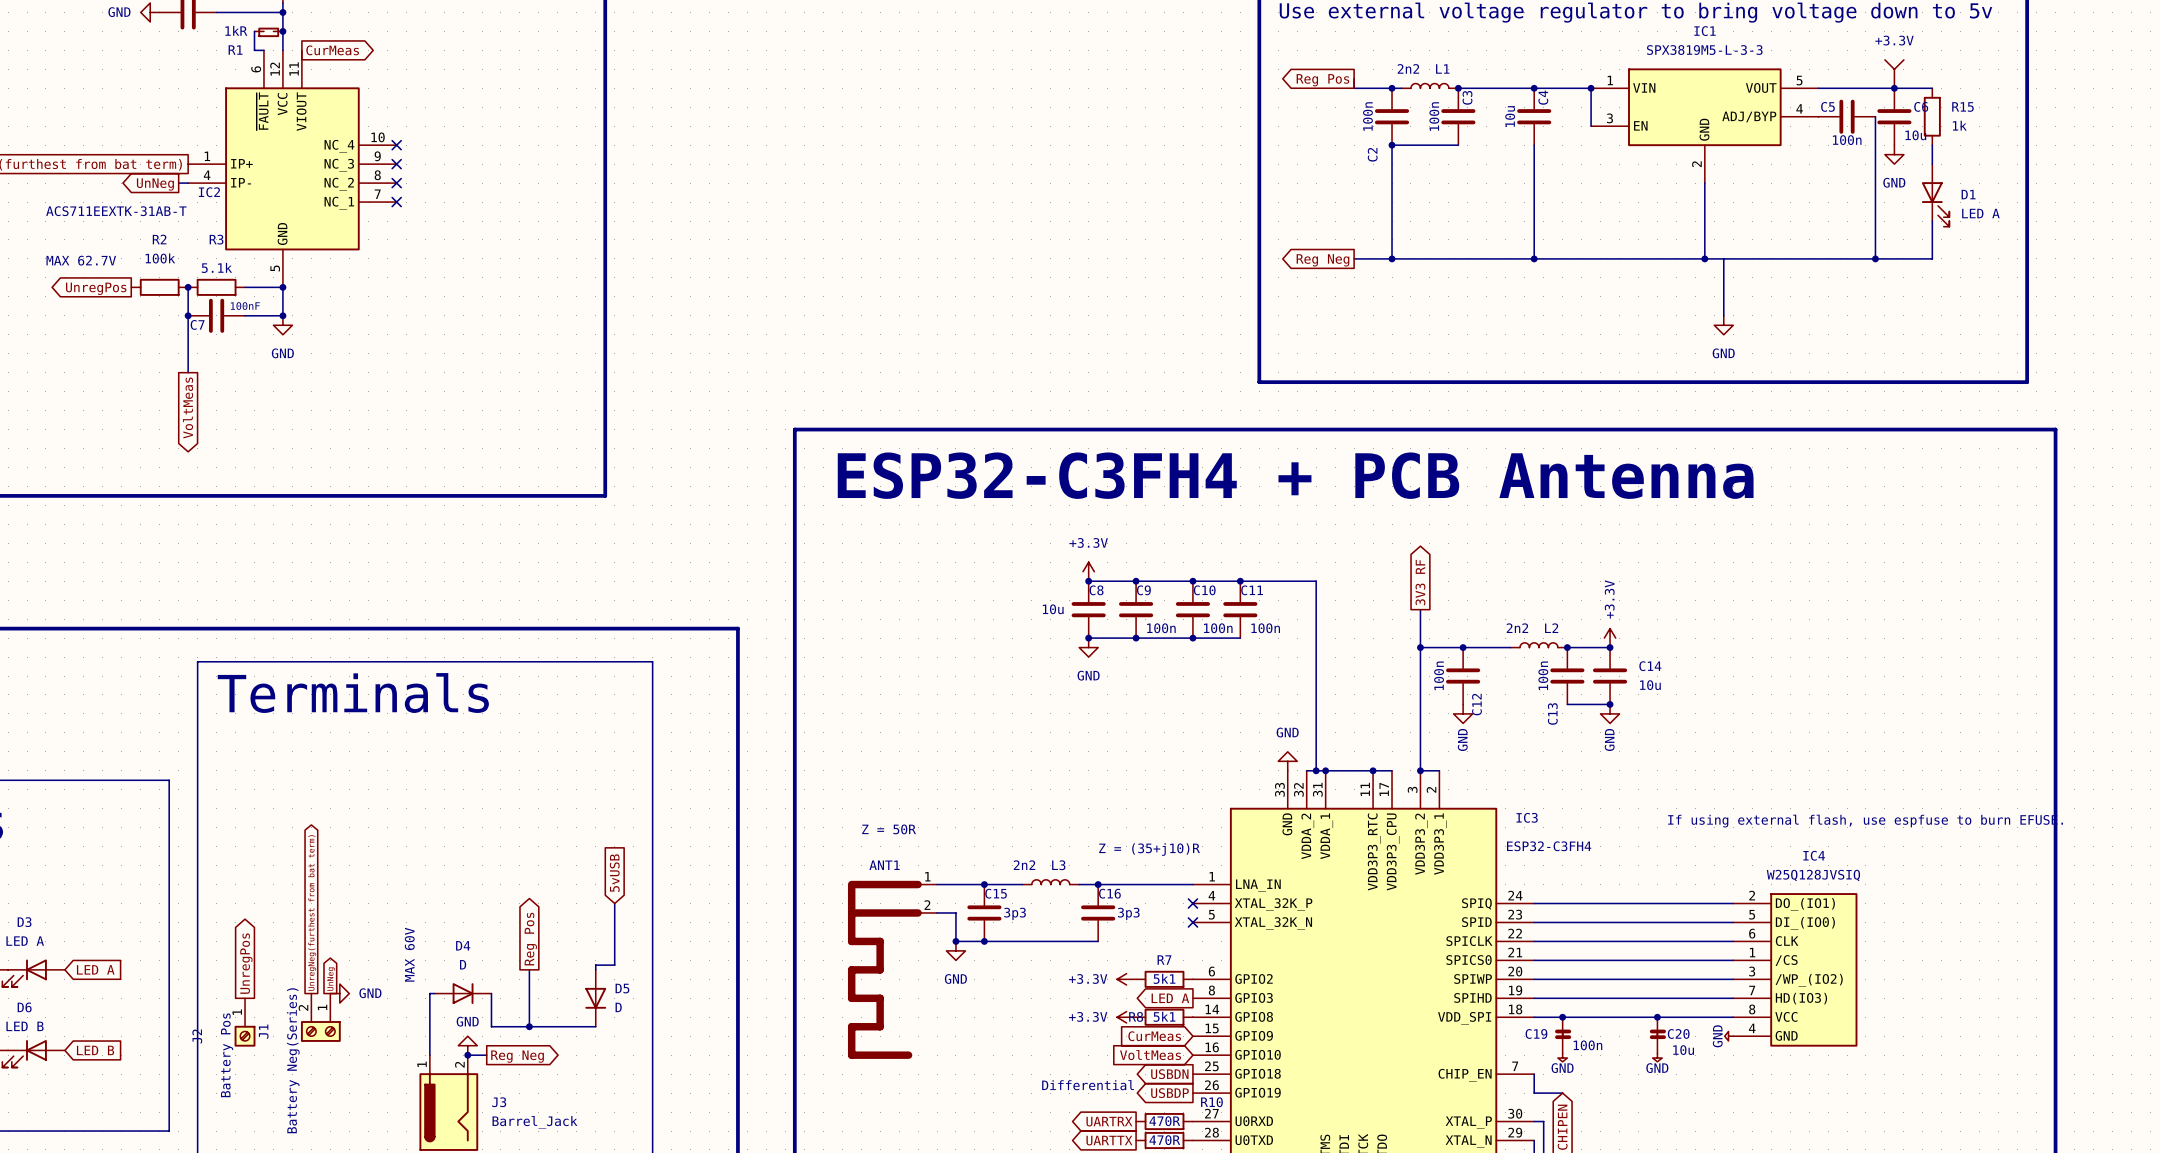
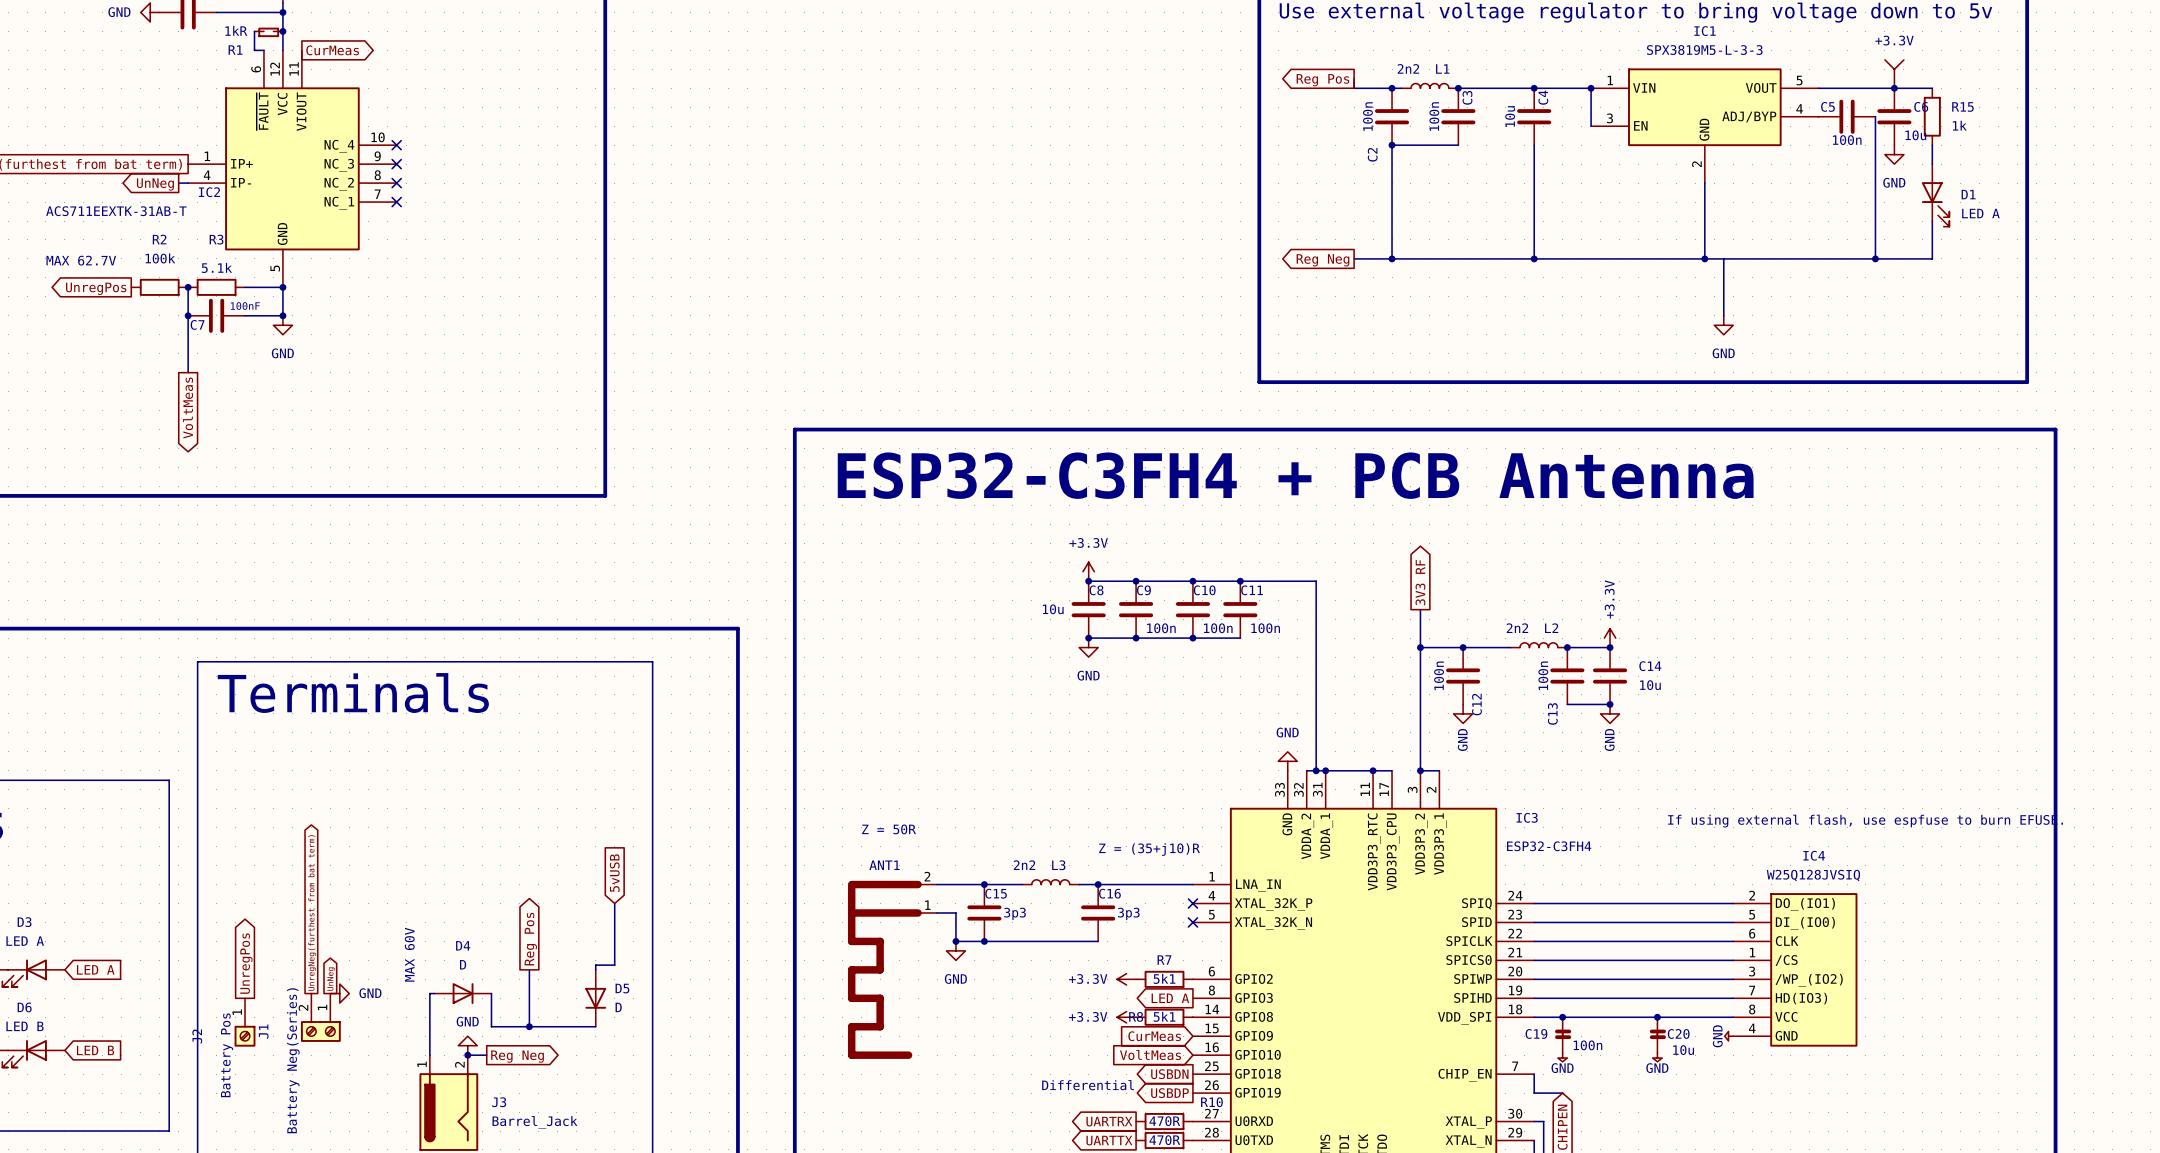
ANT1 pin number: 1 (927, 876) -> 2 (927, 876)
ANT1 pin number: 2 (927, 905) -> 1 (927, 905)

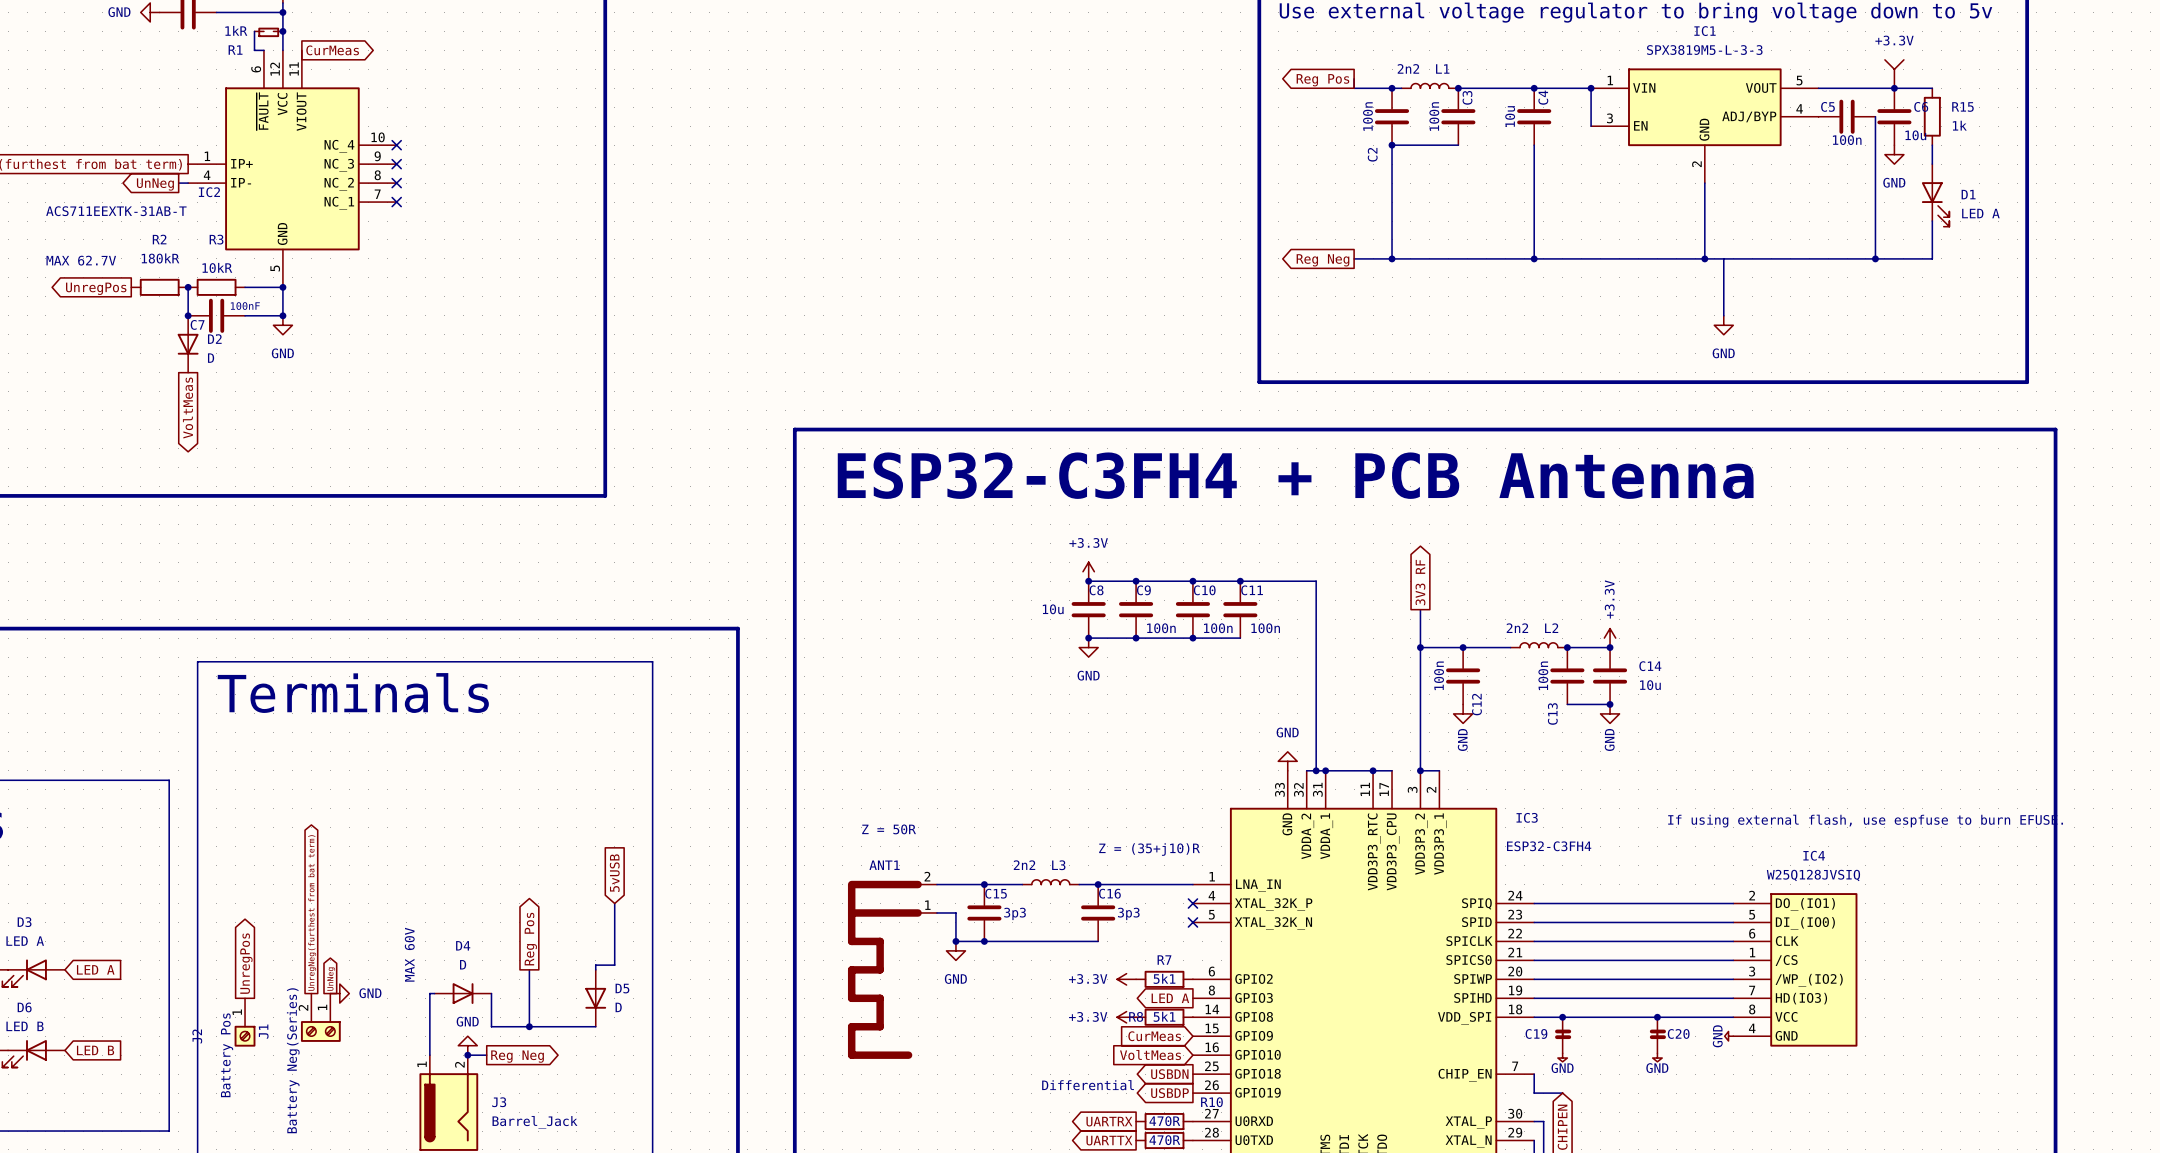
R2 value: 100k (160, 258) -> 180kR (160, 258)
R3 value: 5.1k (216, 267) -> 10kR (217, 267)
D2: none -> D (188, 344)
C19 value: 100n (1587, 1045) -> none
C20 value: 10u (1683, 1050) -> none

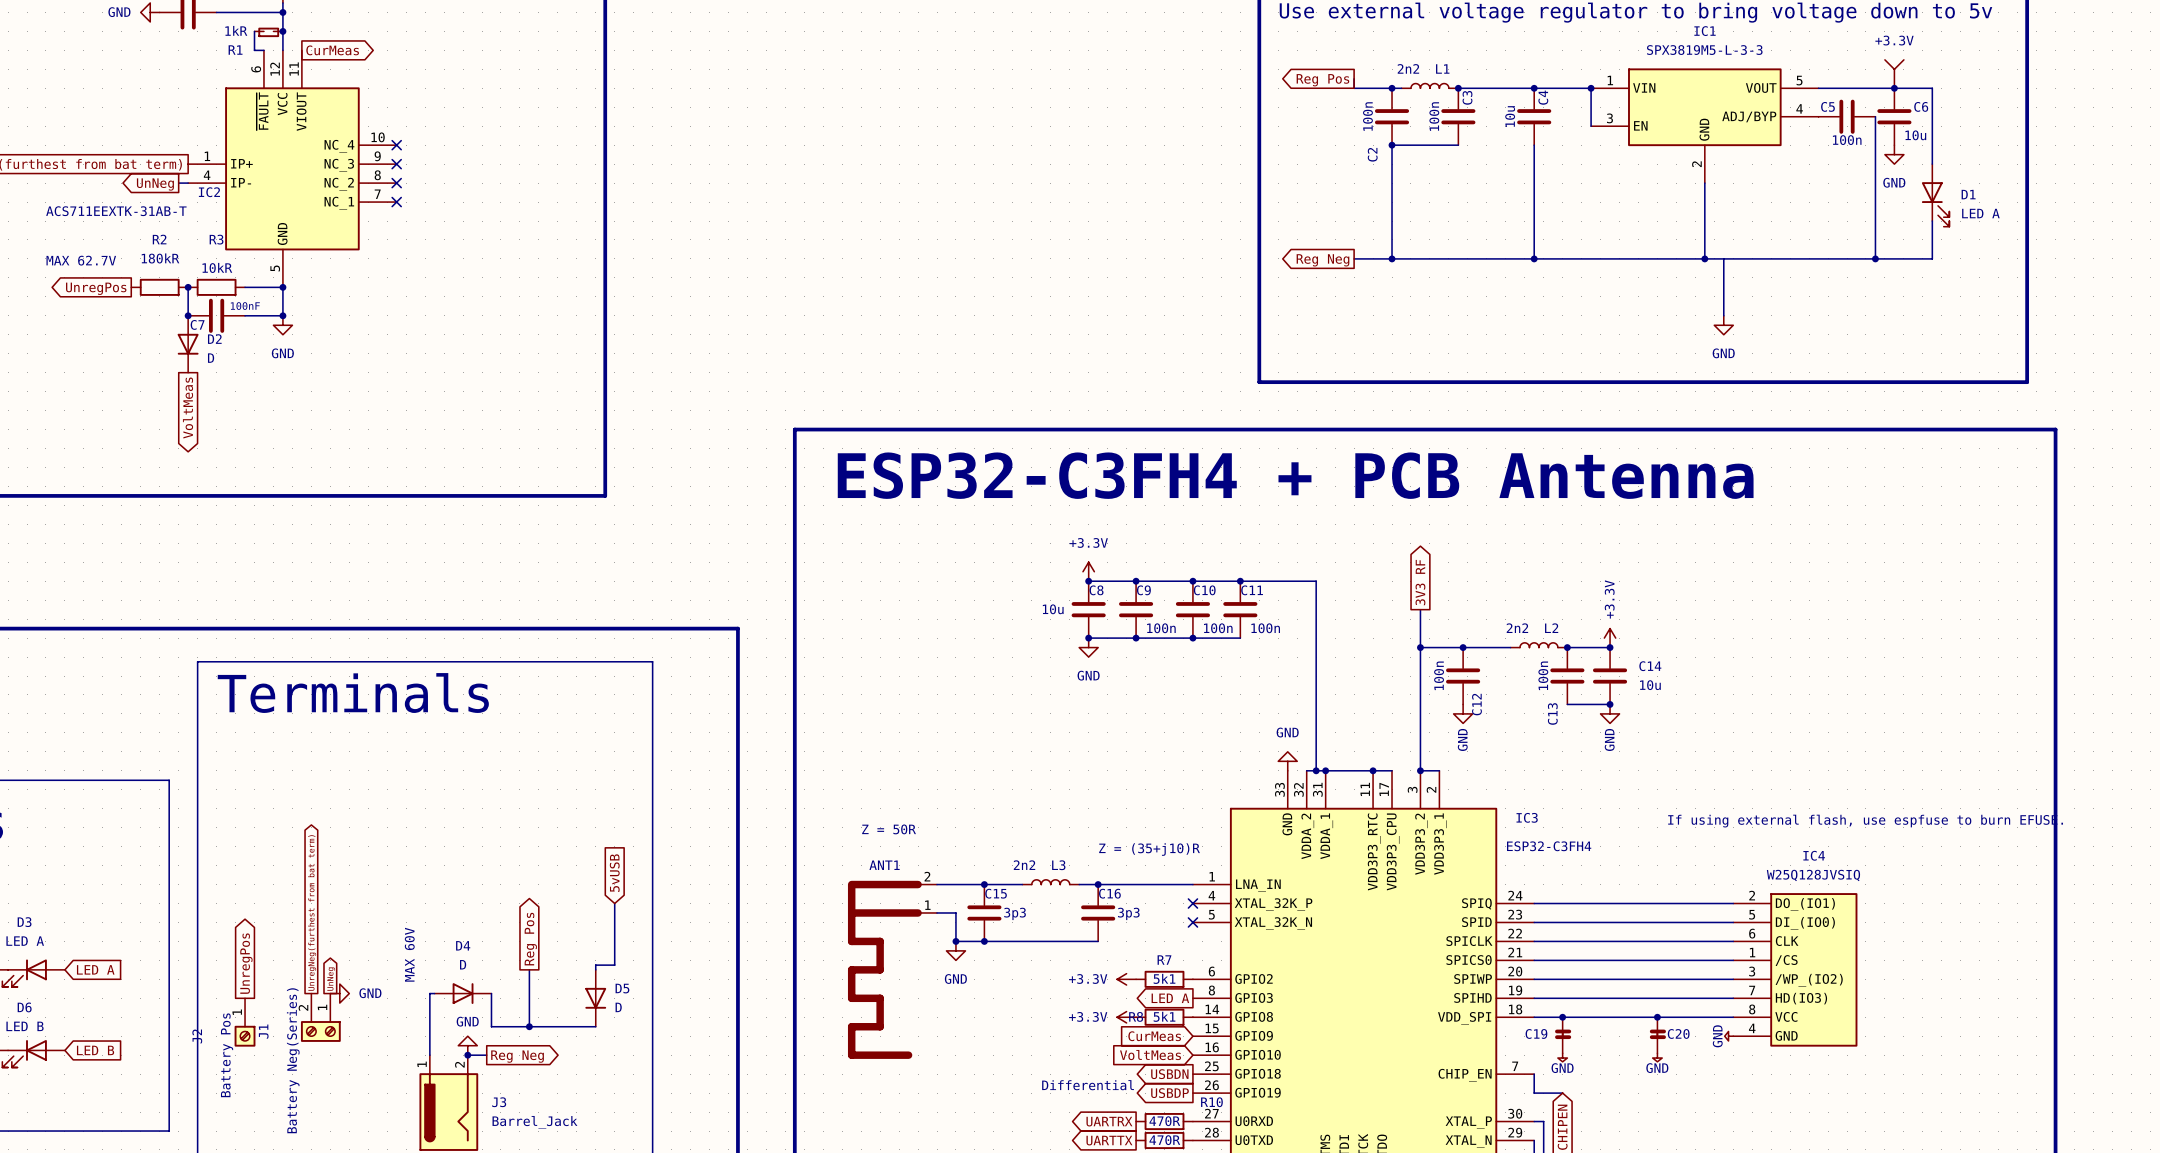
wire: none -> (1932, 88) (1932, 145)
R15: 1k (1932, 116) -> none

